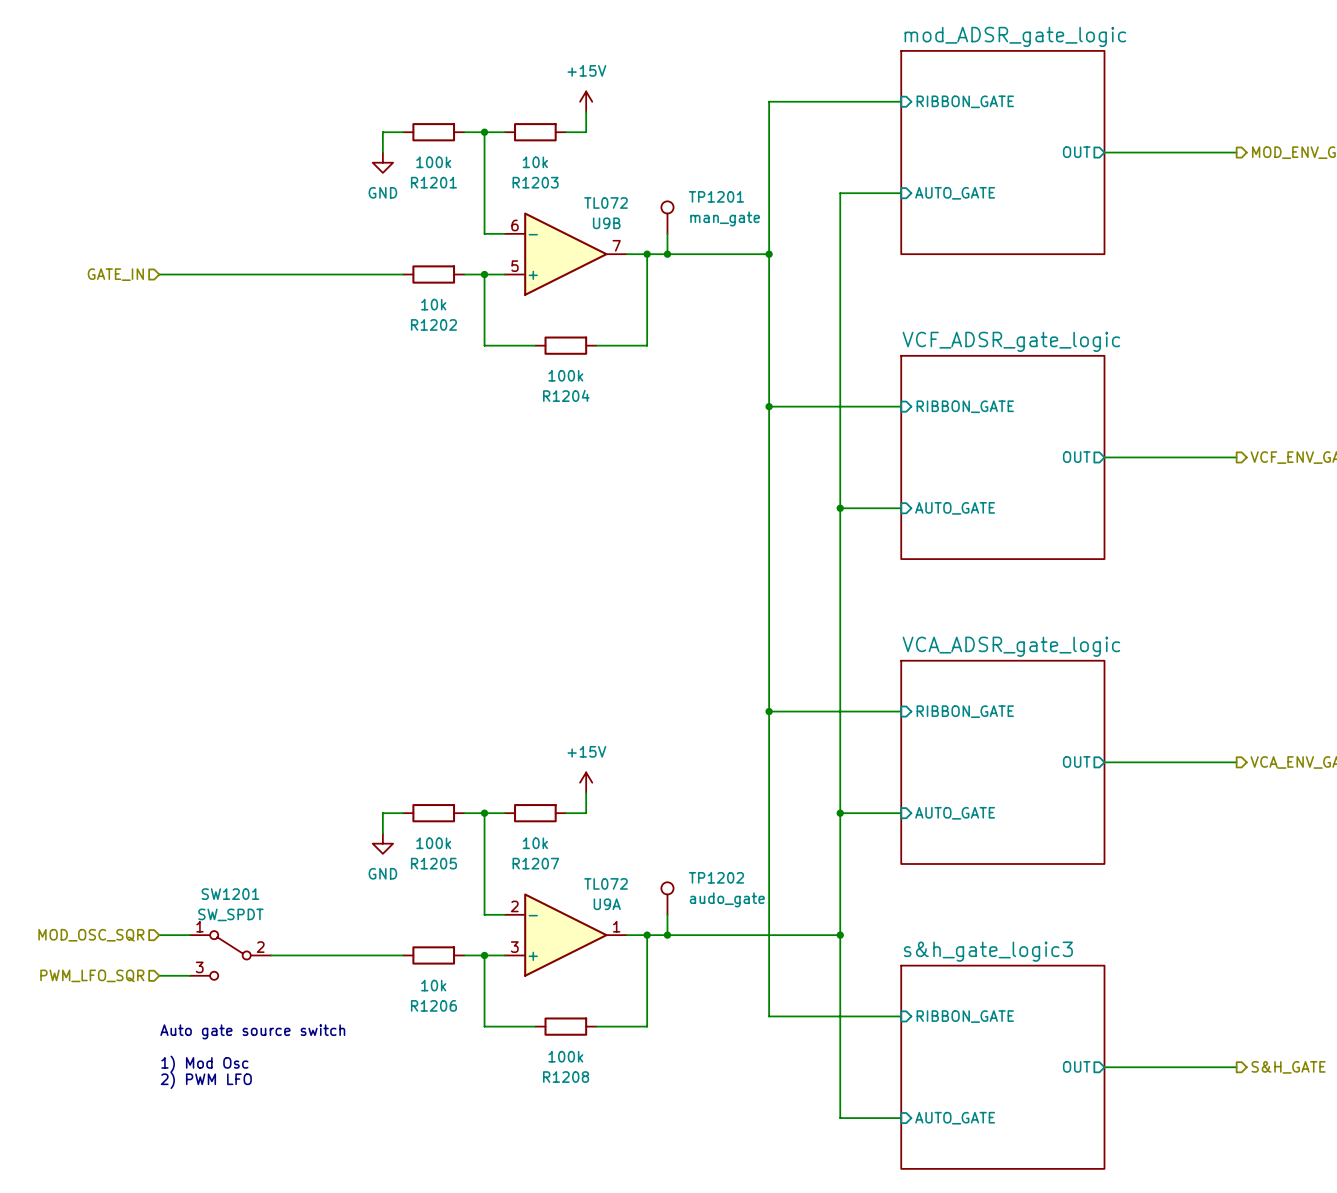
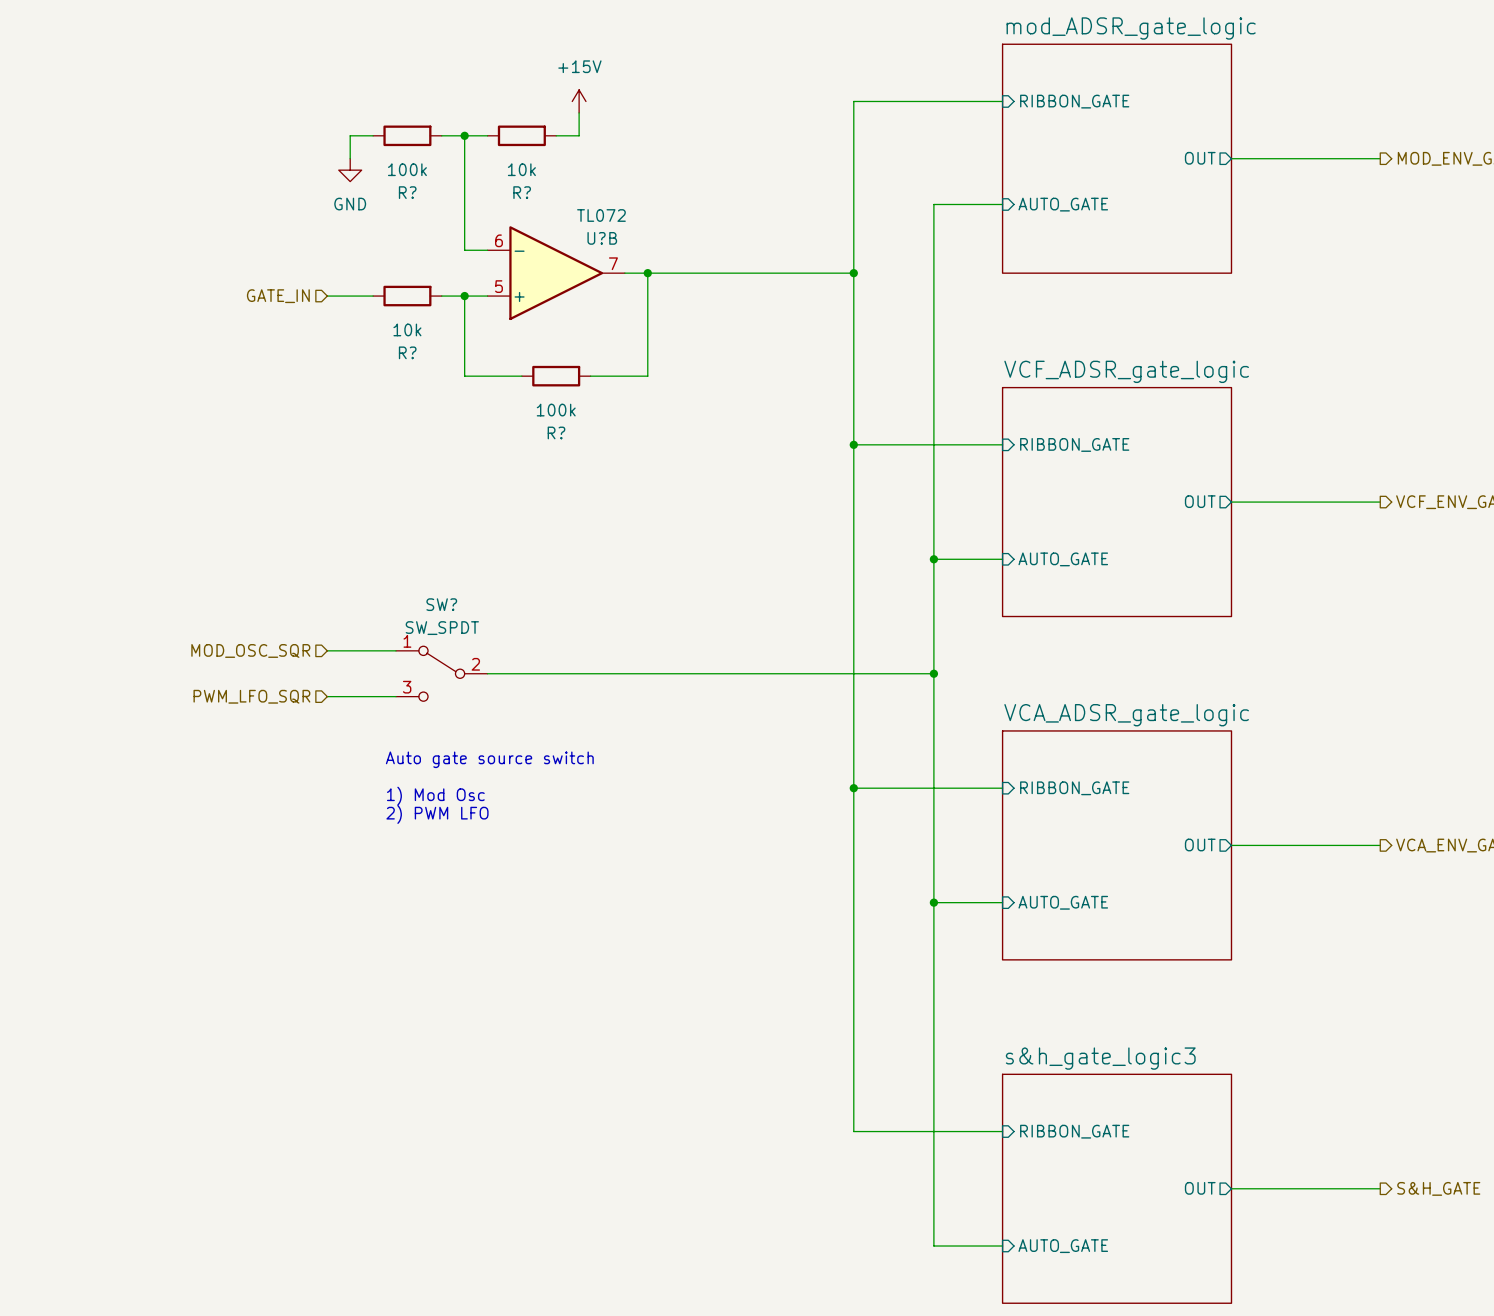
power symbol position: +15V (586, 101) -> +15V (579, 101)
wire: (586, 111) (586, 132) (565, 132) -> none
wire: none -> (373, 135) (350, 135) (350, 158)
R?: none -> 100k (407, 135)
wire: (403, 132) (382, 132) (382, 152) -> (441, 135) (487, 135)
junction: none -> (464, 135)
R1201: 100k (433, 132) -> none
wire: (464, 132) (504, 132) -> (579, 112) (579, 135) (556, 135)
R?: none -> 10k (521, 135)
wire: (484, 132) (484, 233) (504, 233) -> (464, 135) (464, 250) (487, 250)
junction: (484, 132) -> none
R1203: 10k (535, 132) -> none
power symbol position: GND (382, 162) -> GND (350, 170)
TP1201: man_gate (667, 217) -> none
wire: (667, 233) (667, 254) -> none
U?B: none -> TL072 (556, 273)
U9B: TL072 (565, 254) -> none
junction: none -> (647, 273)
wire: (647, 254) (647, 345) (596, 345) -> none
junction: (647, 254) -> none
junction: (667, 254) -> none
hierarchical label position: GATE_IN (115, 274) -> GATE_IN (278, 296)
wire: (159, 274) (301, 274) -> none
wire: (342, 274) (403, 274) -> (487, 296) (441, 296)
R?: none -> 10k (407, 296)
wire: none -> (464, 296) (464, 376) (521, 376)
junction: none -> (464, 296)
R1202: 10k (433, 274) -> none
wire: (484, 274) (484, 345) (535, 345) -> (647, 273) (647, 376) (590, 376)
junction: (484, 274) -> none
R?: none -> 100k (556, 376)
R1204: 100k (565, 345) -> none
hierarchical label: none -> MOD_OSC_SQR (250, 650)
wire: none -> (327, 650) (395, 650)
SW?: none -> SW_SPDT (441, 673)
wire: none -> (487, 673) (933, 673)
junction: none -> (933, 673)
hierarchical label: none -> PWM_LFO_SQR (251, 696)
wire: none -> (327, 696) (395, 696)
text: none -> Auto gate source switch (489, 759)
text: none -> 1) Mod Osc (435, 796)
text: none -> 2) PWM LFO (437, 814)
power symbol: +15V (586, 782) -> none
wire: (586, 792) (586, 813) (565, 813) -> none
wire: (403, 813) (382, 813) (382, 833) -> none
R1205: 100k (433, 813) -> none
wire: (464, 813) (504, 813) -> none
wire: (484, 813) (484, 914) (504, 914) -> none
junction: (484, 813) -> none
R1207: 10k (535, 813) -> none
power symbol: GND (382, 843) -> none
TP1202: audo_gate (667, 898) -> none
wire: (667, 914) (667, 935) -> none
hierarchical label: MOD_OSC_SQR (91, 935) -> none
wire: (159, 935) (189, 935) -> none
U9A: TL072 (565, 935) -> none
wire: (626, 935) (840, 935) -> none
wire: (647, 935) (647, 1026) (596, 1026) -> none
junction: (647, 935) -> none
junction: (667, 935) -> none
junction: (840, 935) -> none
SW1201: SW_SPDT (230, 955) -> none
wire: (271, 955) (403, 955) -> none
R1206: 10k (433, 955) -> none
wire: (464, 955) (504, 955) -> none
wire: (484, 955) (484, 1026) (535, 1026) -> none
junction: (484, 955) -> none
hierarchical label: PWM_LFO_SQR (92, 975) -> none
wire: (159, 975) (189, 975) -> none
R1208: 100k (565, 1026) -> none
text: Auto gate source switch (252, 1031) -> none
text: 1) Mod Osc (204, 1064) -> none
text: 2) PWM LFO (206, 1080) -> none

